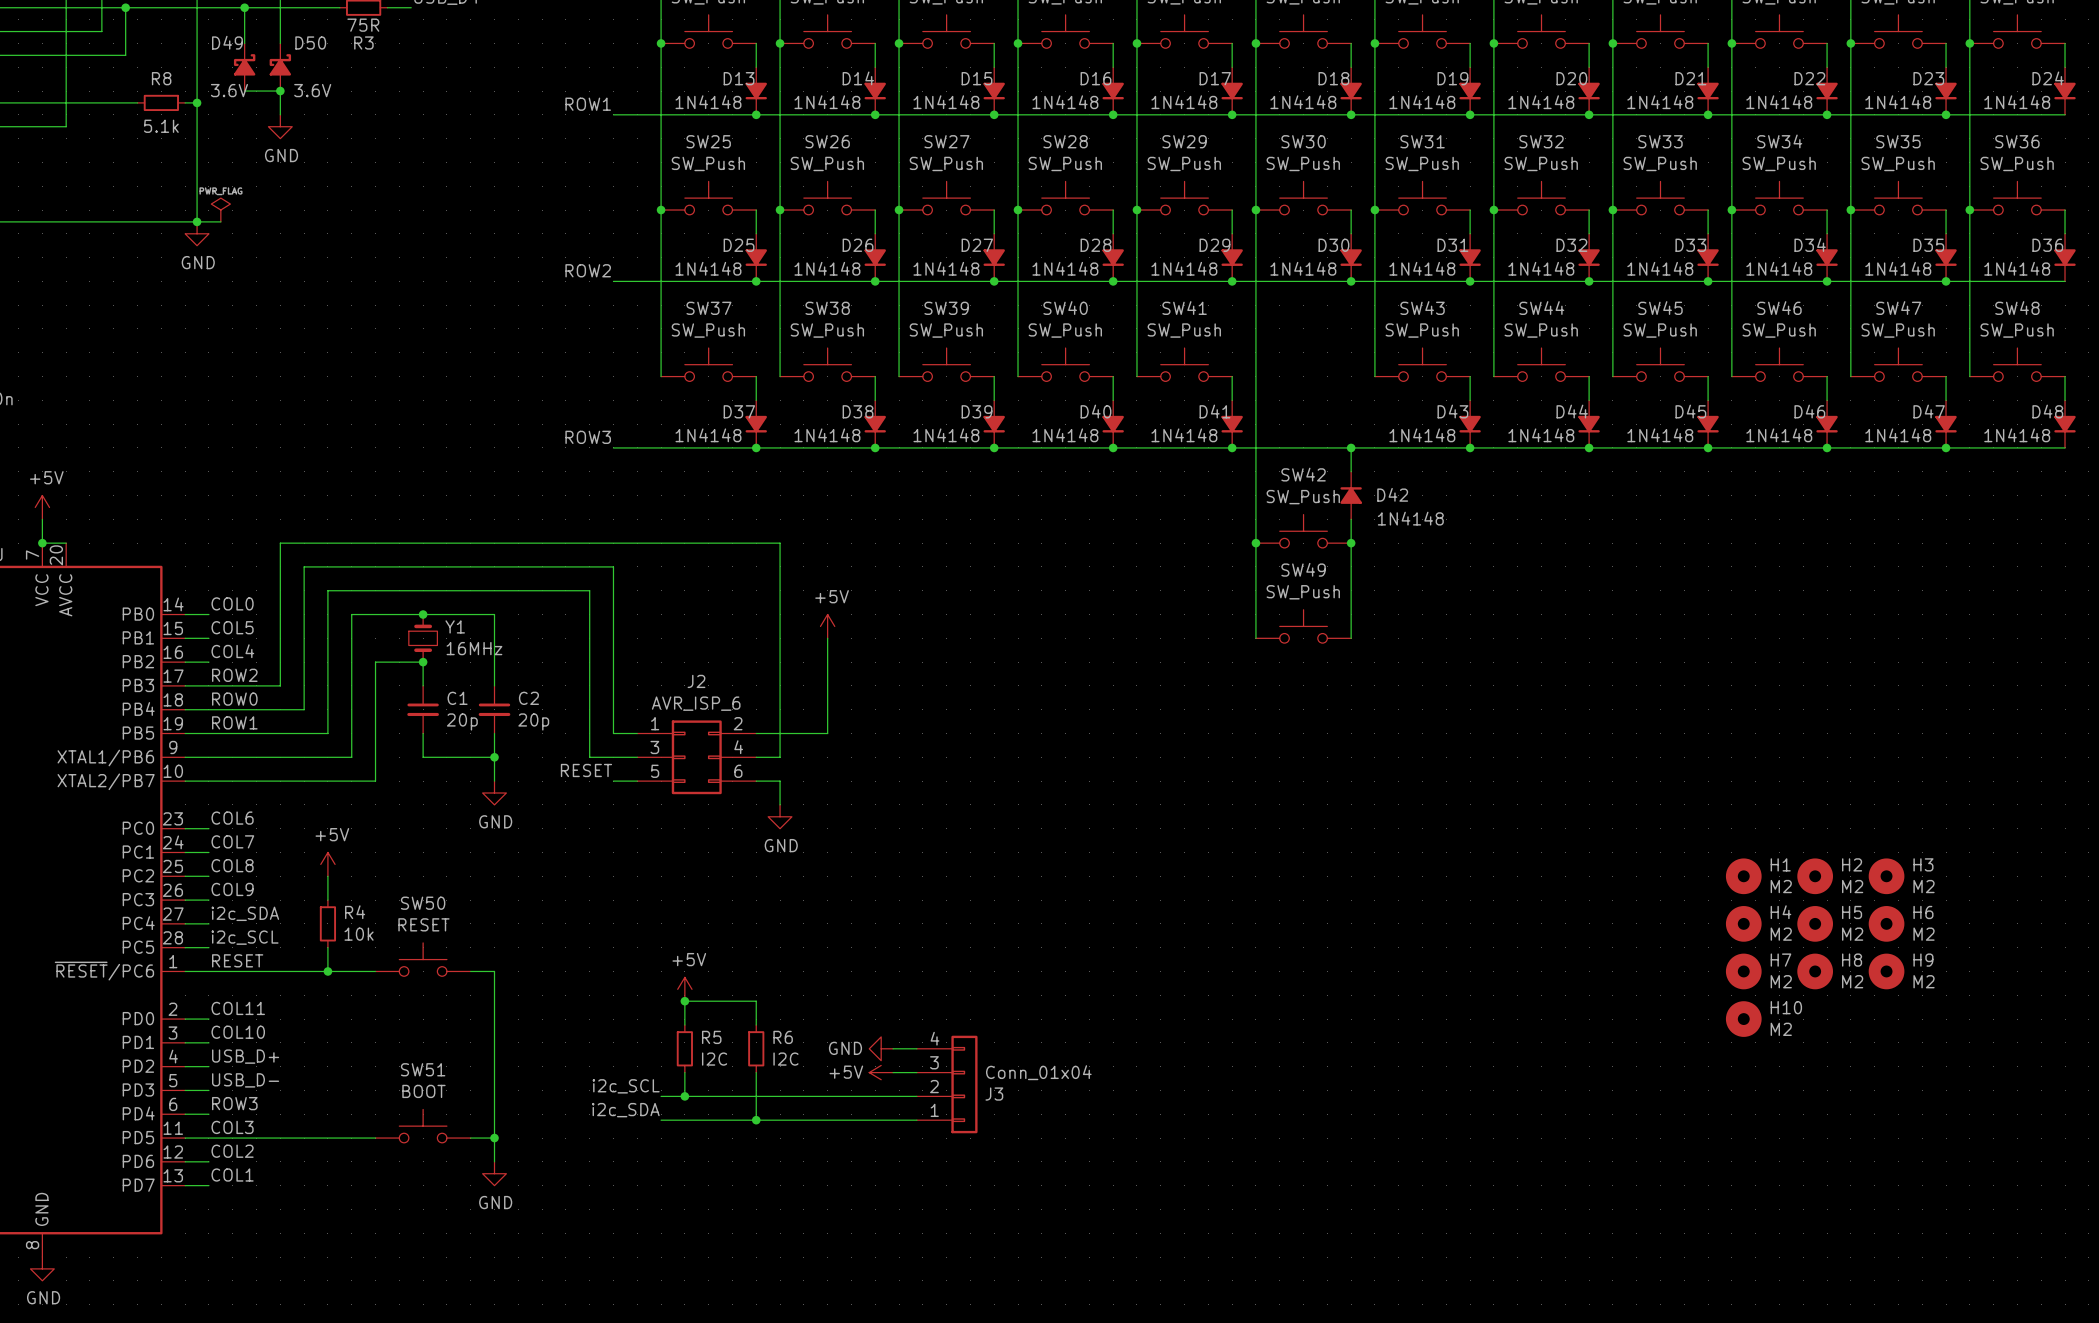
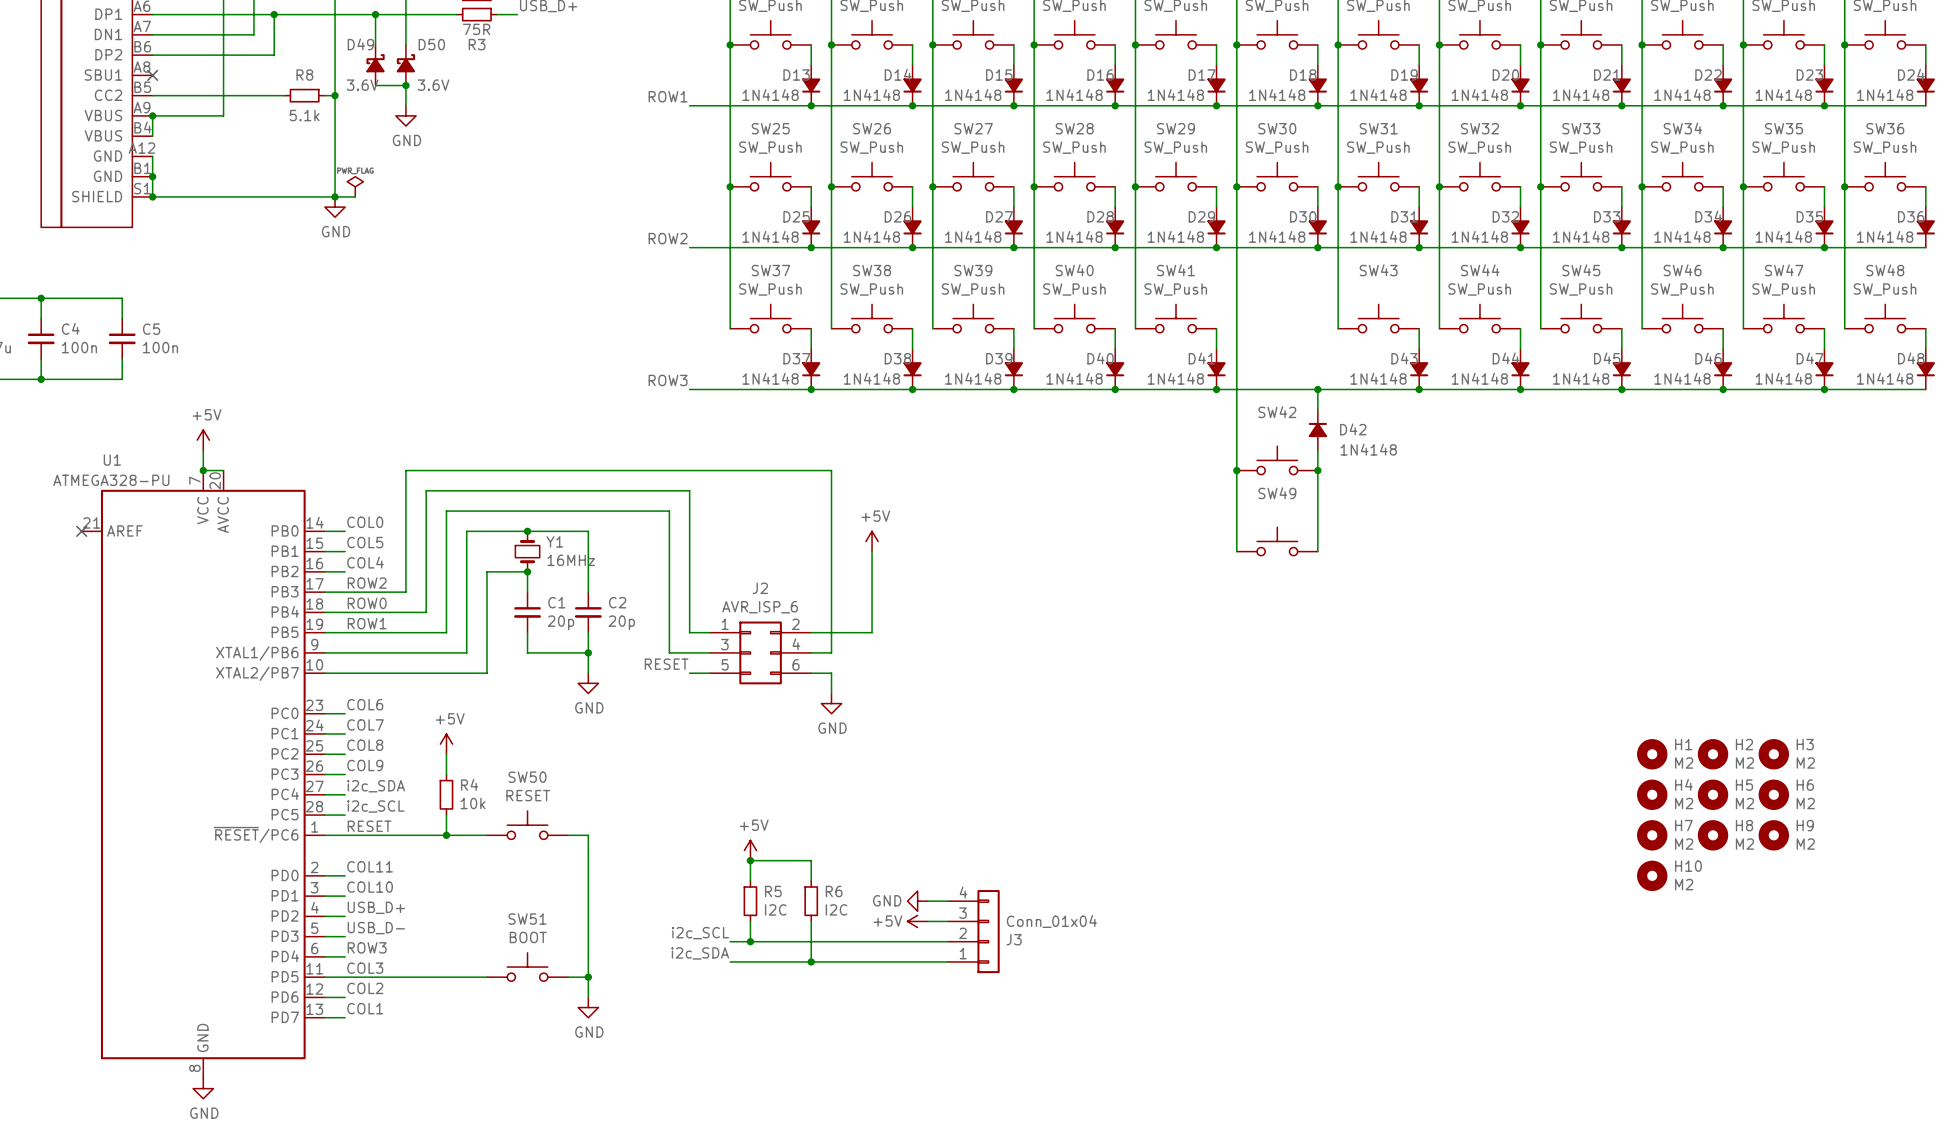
SW43 value: SW_Push (1422, 330) -> none
SW42 value: SW_Push (1303, 497) -> none
SW49 value: SW_Push (1303, 592) -> none

